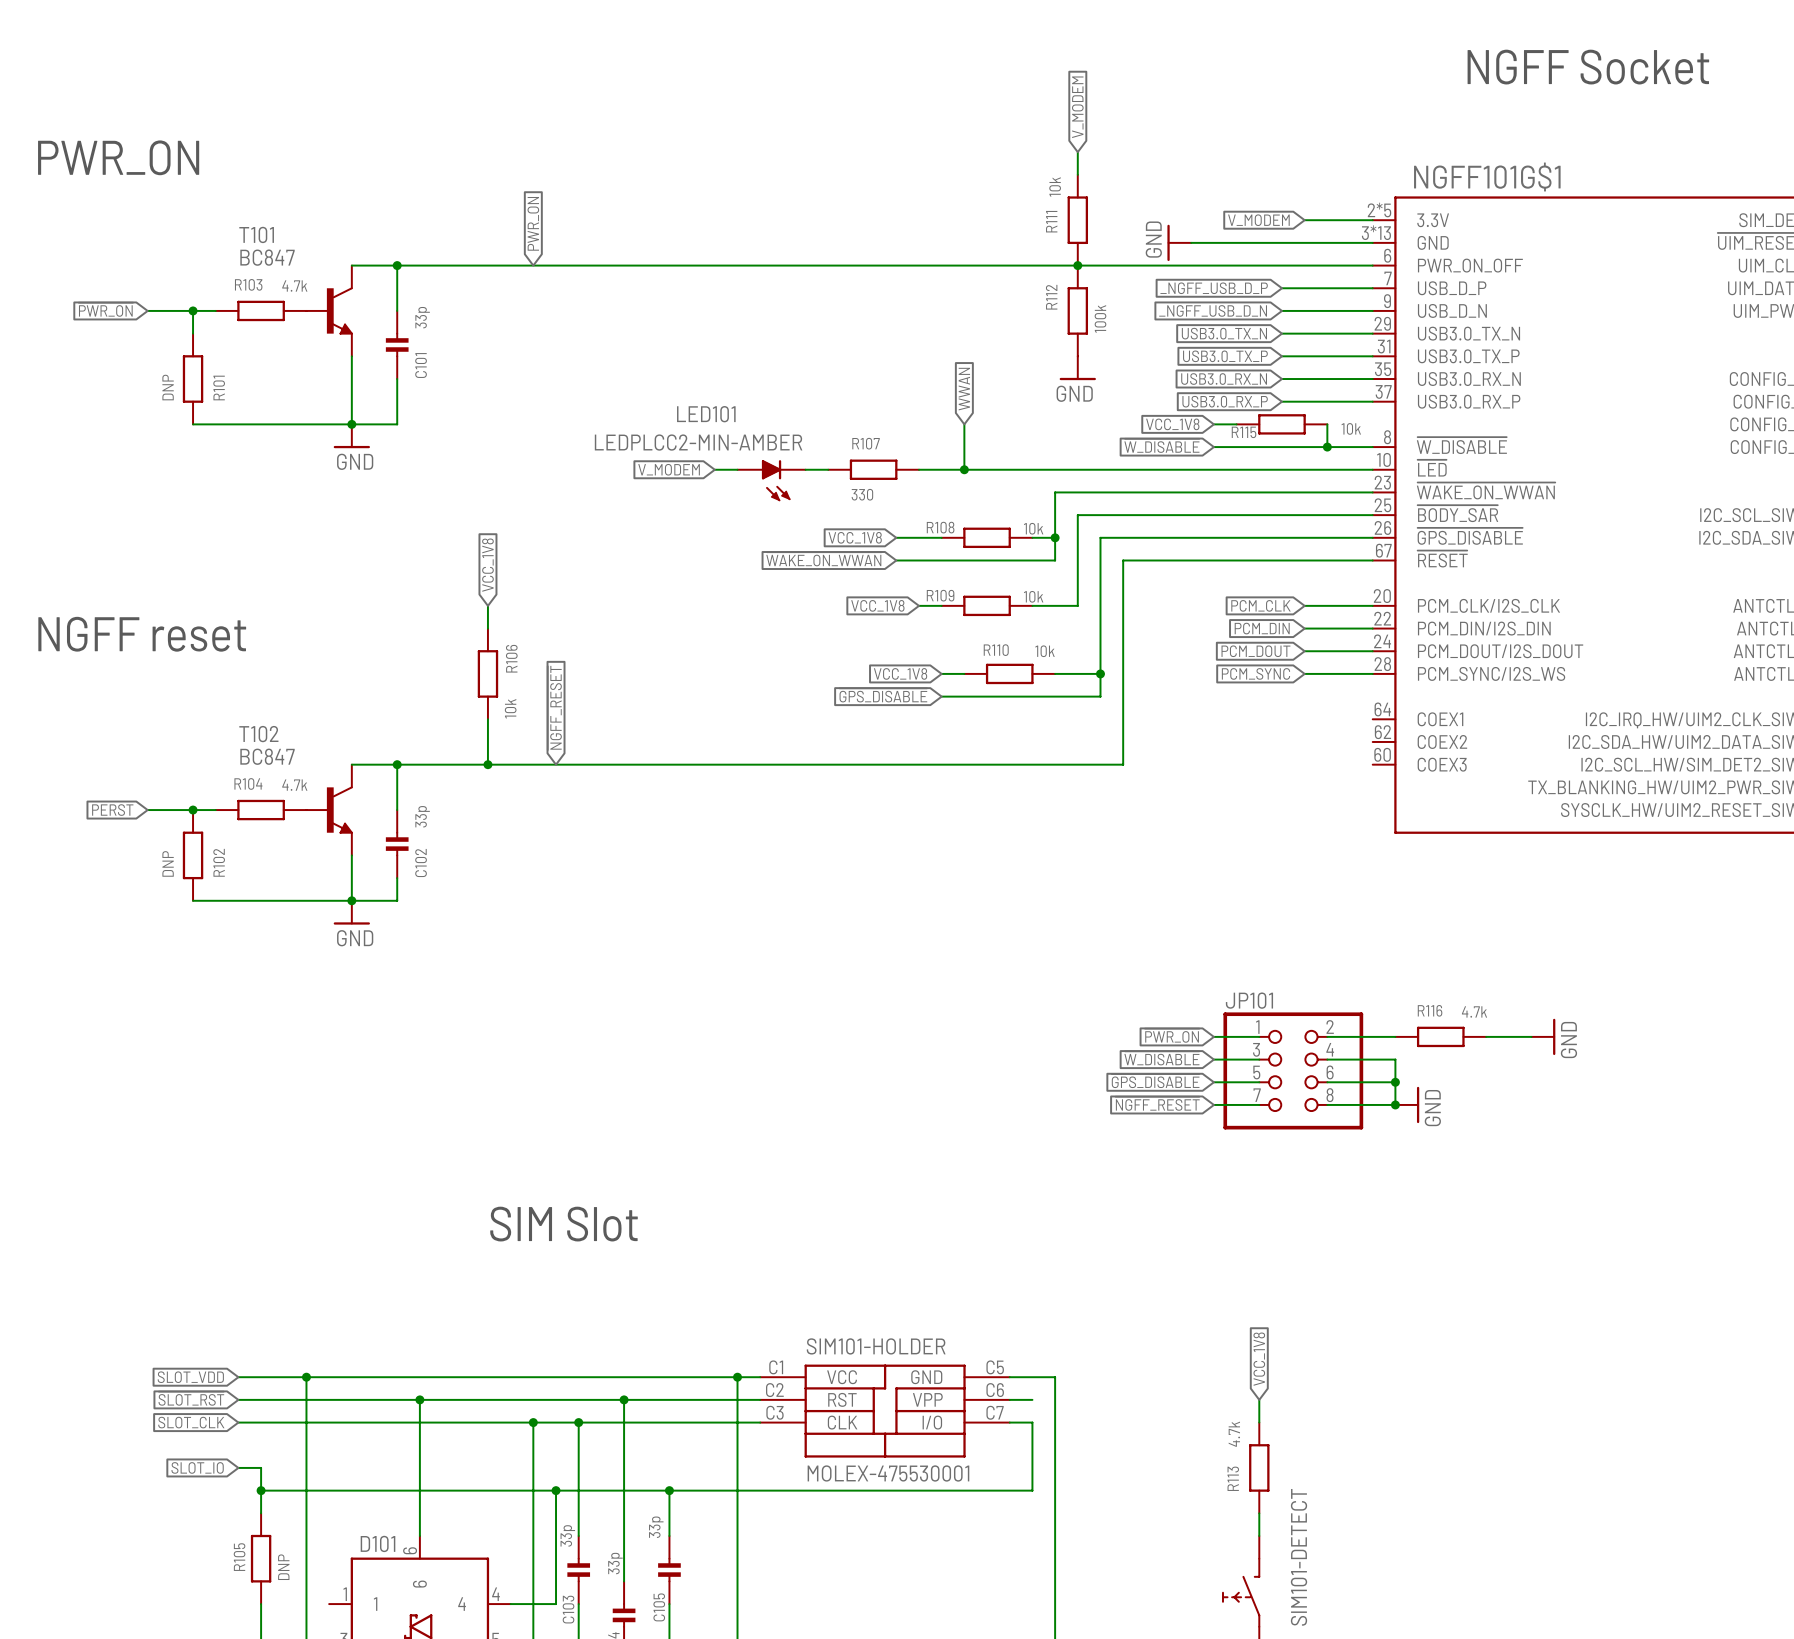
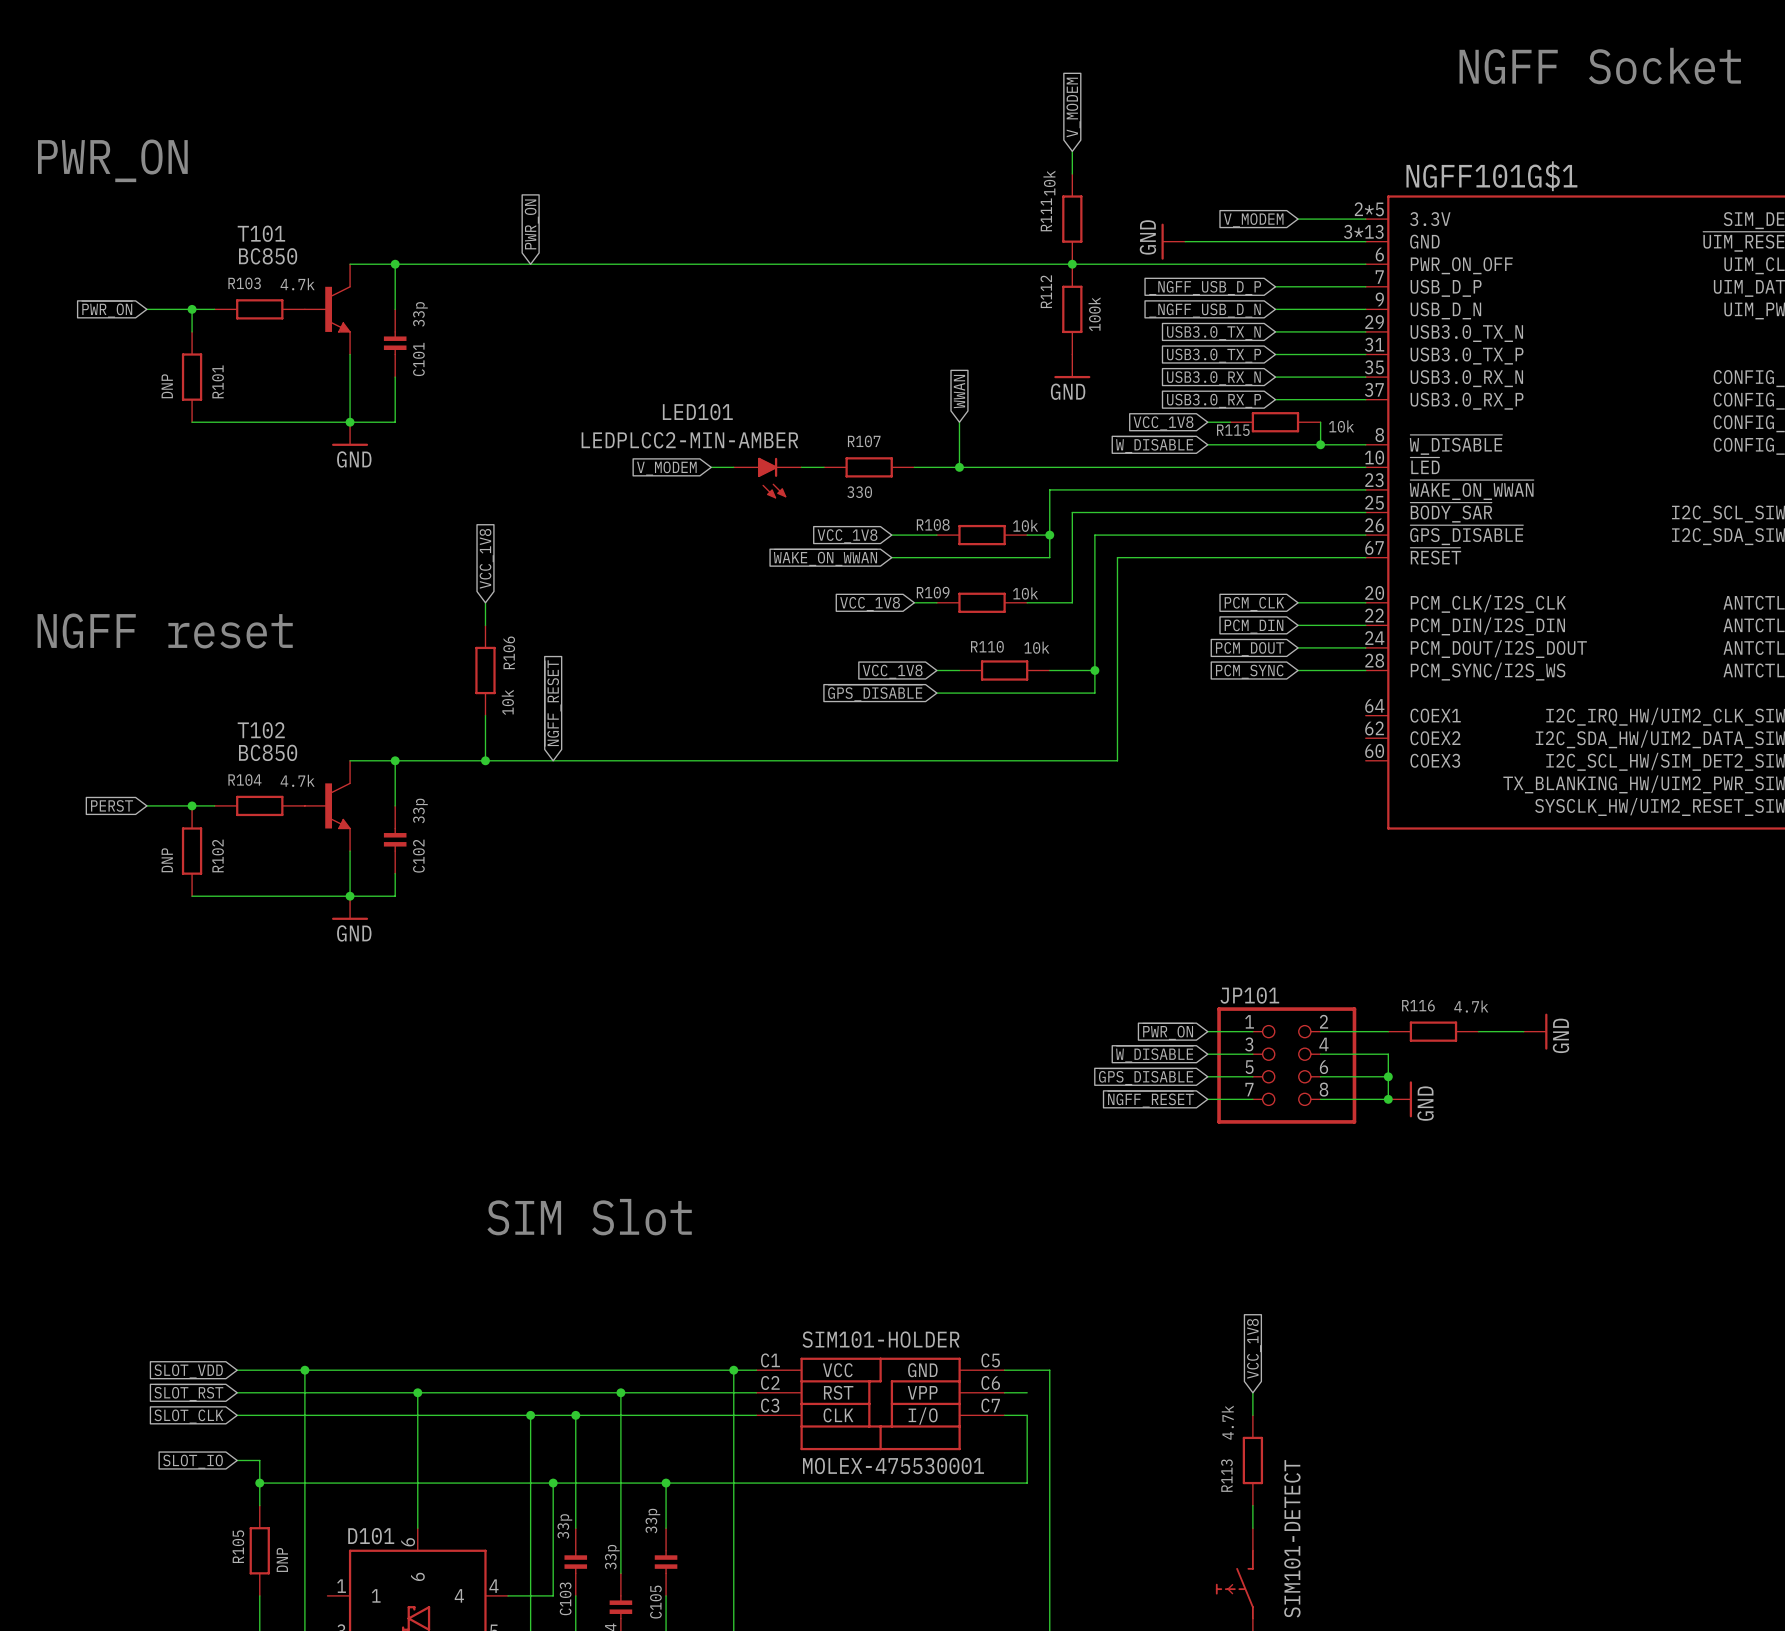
T101 value: BC847 (267, 257) -> BC850 (268, 256)
T102 value: BC847 (267, 756) -> BC850 (268, 752)

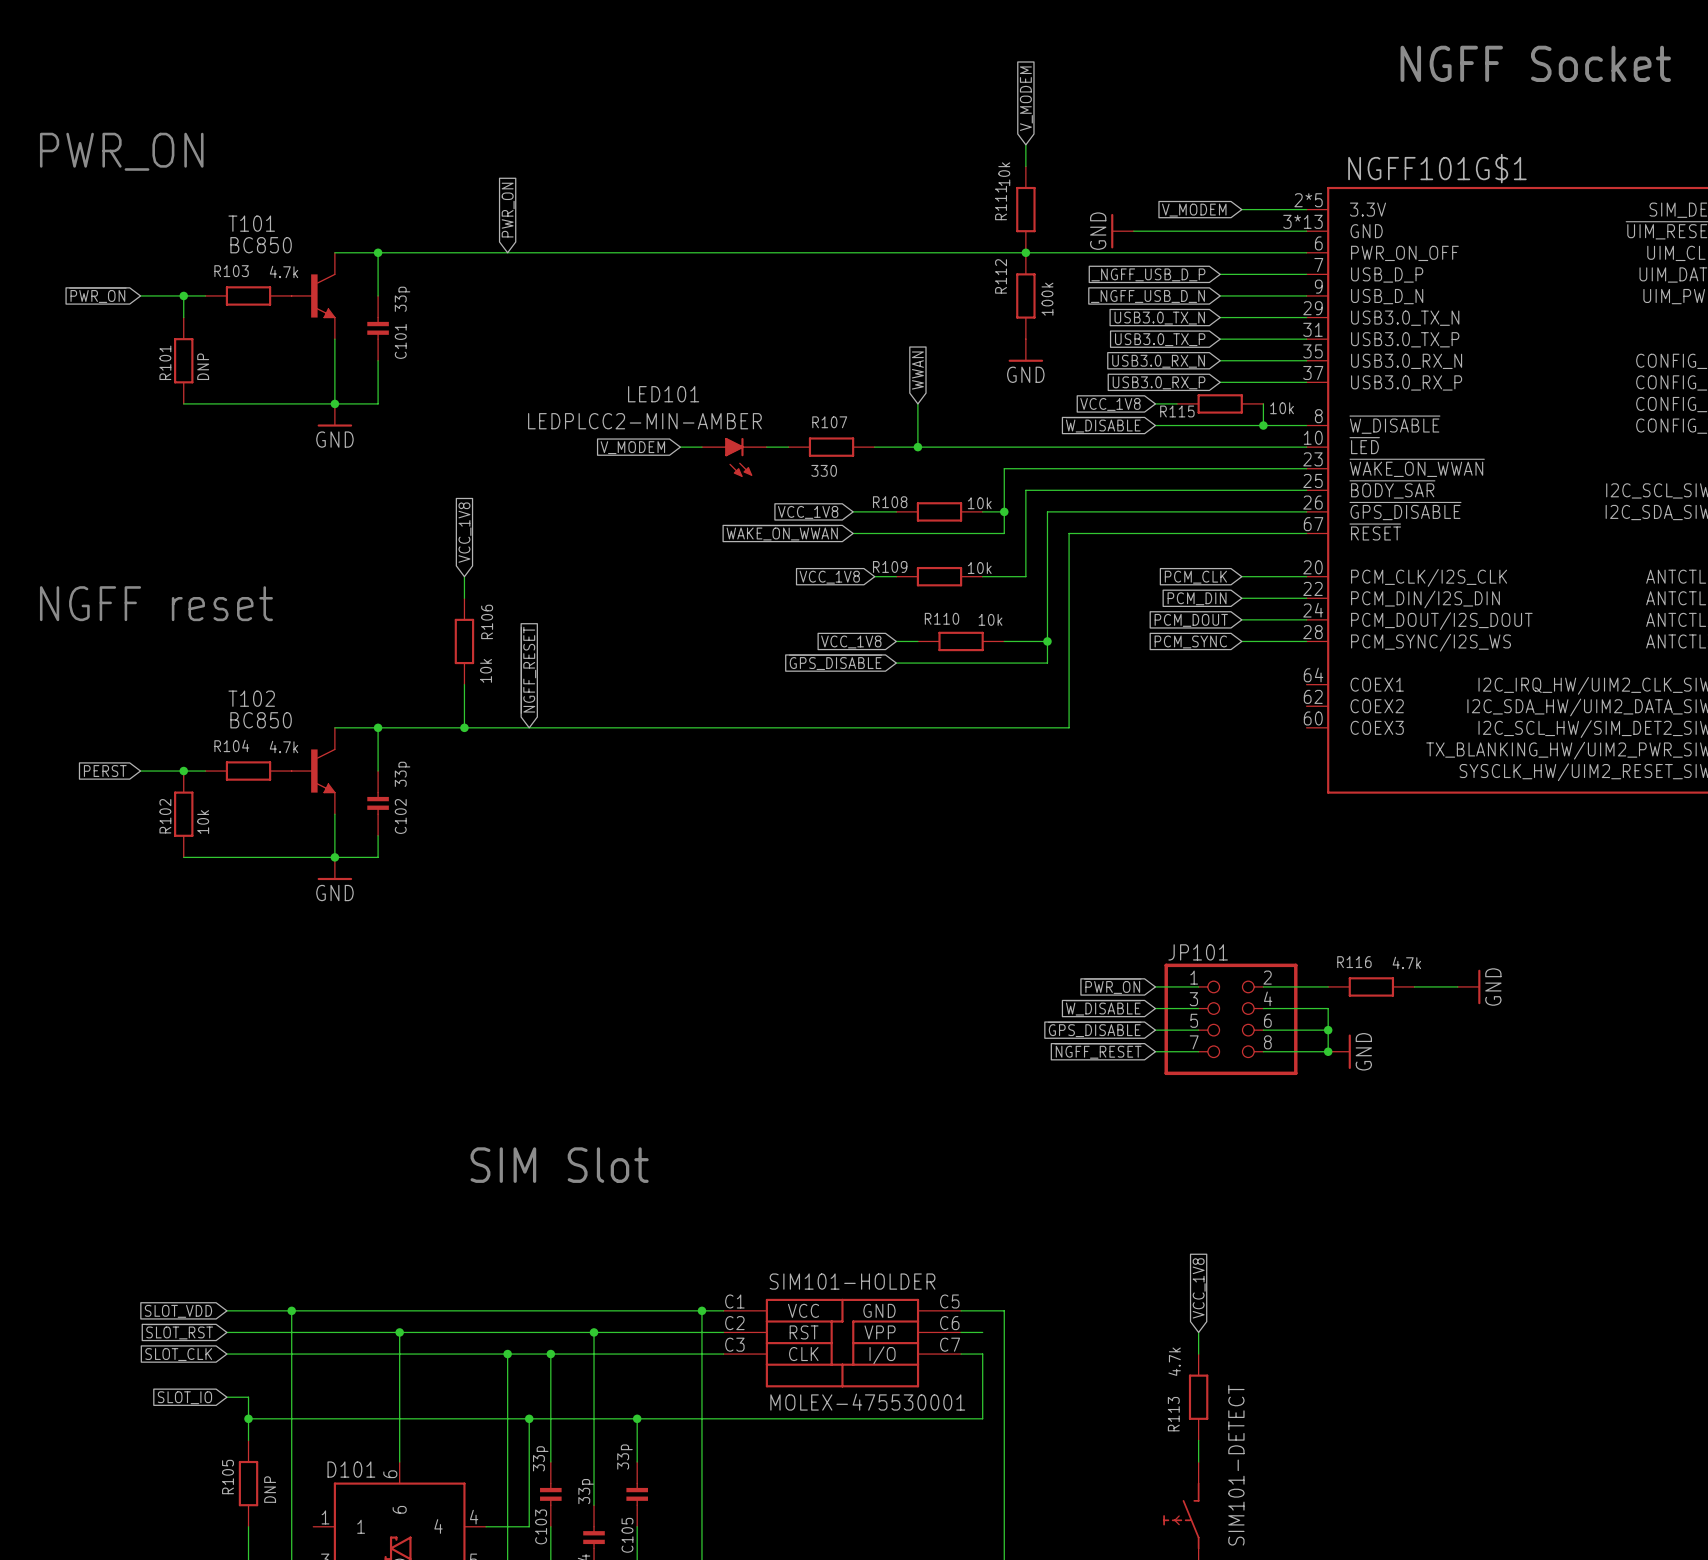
R101 name position: R101 (218, 381) -> R101 (165, 362)
R101 value position: DNP (167, 386) -> DNP (203, 366)
R102 name position: R102 (218, 855) -> R102 (165, 816)
R102 value: DNP (167, 860) -> 10k (203, 822)

